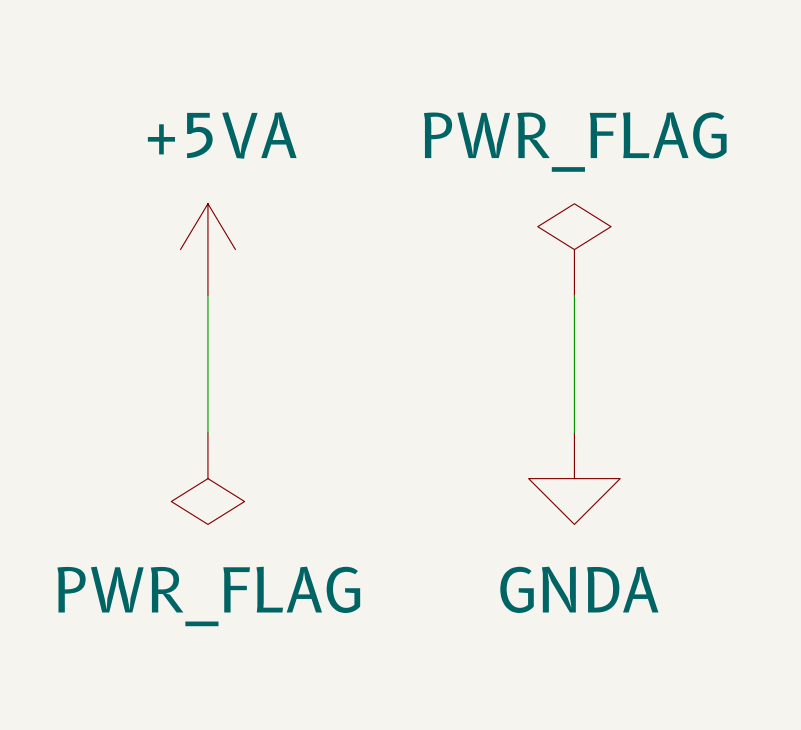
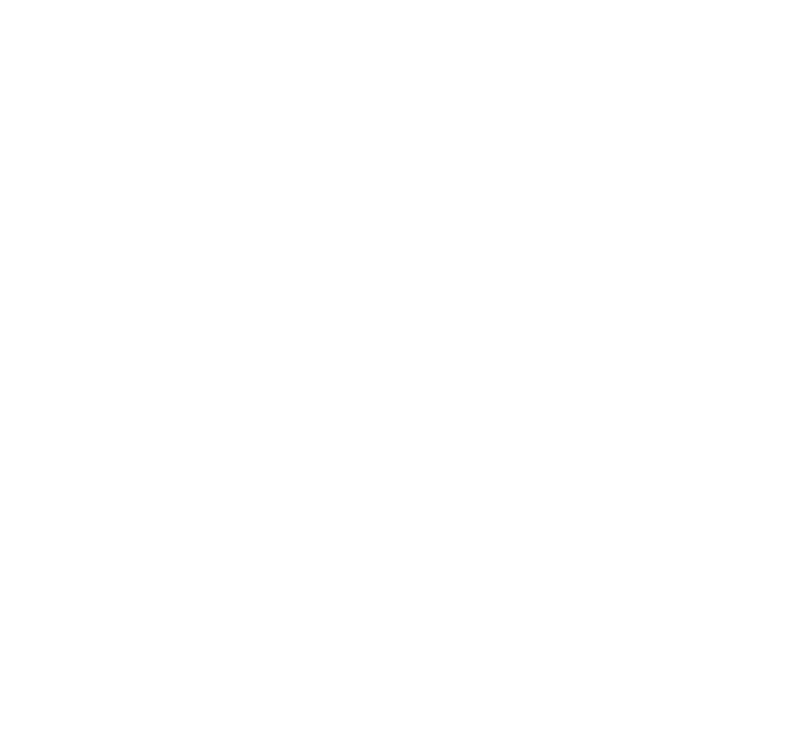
power symbol: +5VA (207, 249) -> none
power symbol: PWR_FLAG (574, 249) -> none
wire: (207, 295) (207, 432) -> none
wire: (574, 295) (574, 432) -> none
power symbol: PWR_FLAG (207, 478) -> none
power symbol: GNDA (574, 478) -> none

